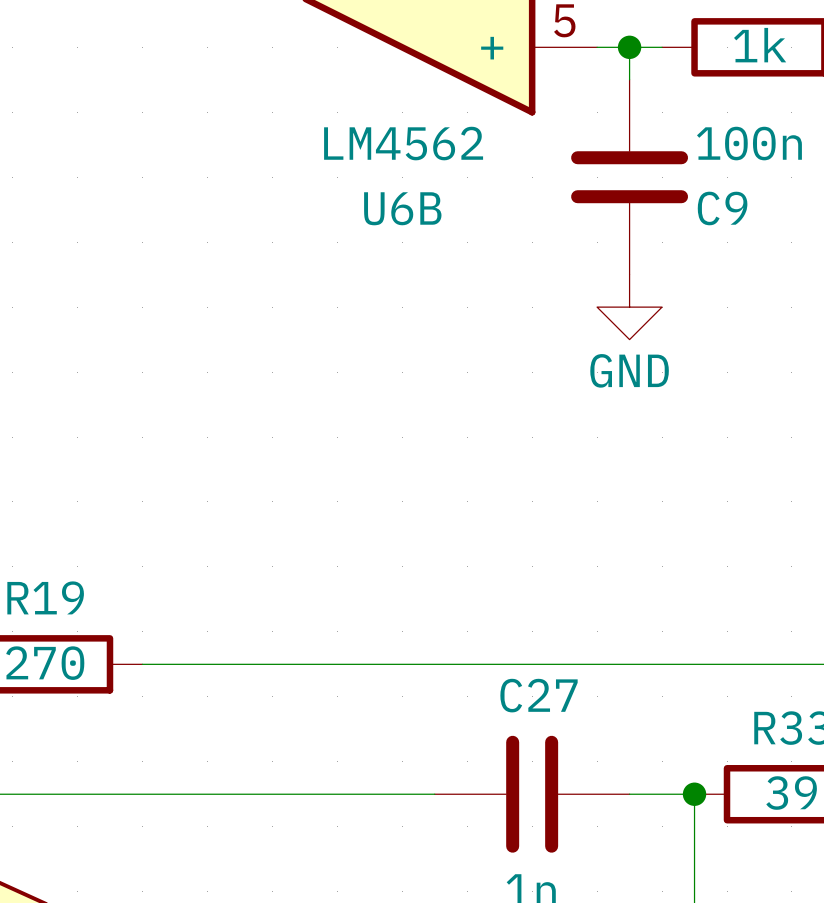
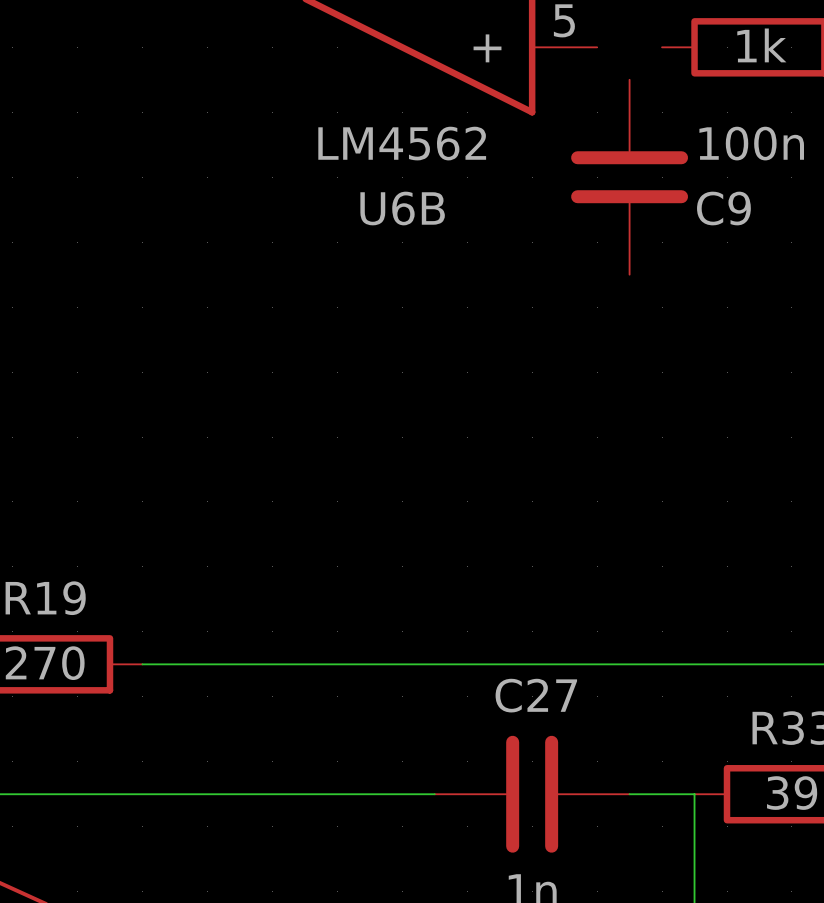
wire: (597, 47) (662, 47) -> none
wire: (629, 47) (629, 79) -> none
junction: (629, 47) -> none
power symbol: GND (629, 307) -> none
junction: (694, 794) -> none

